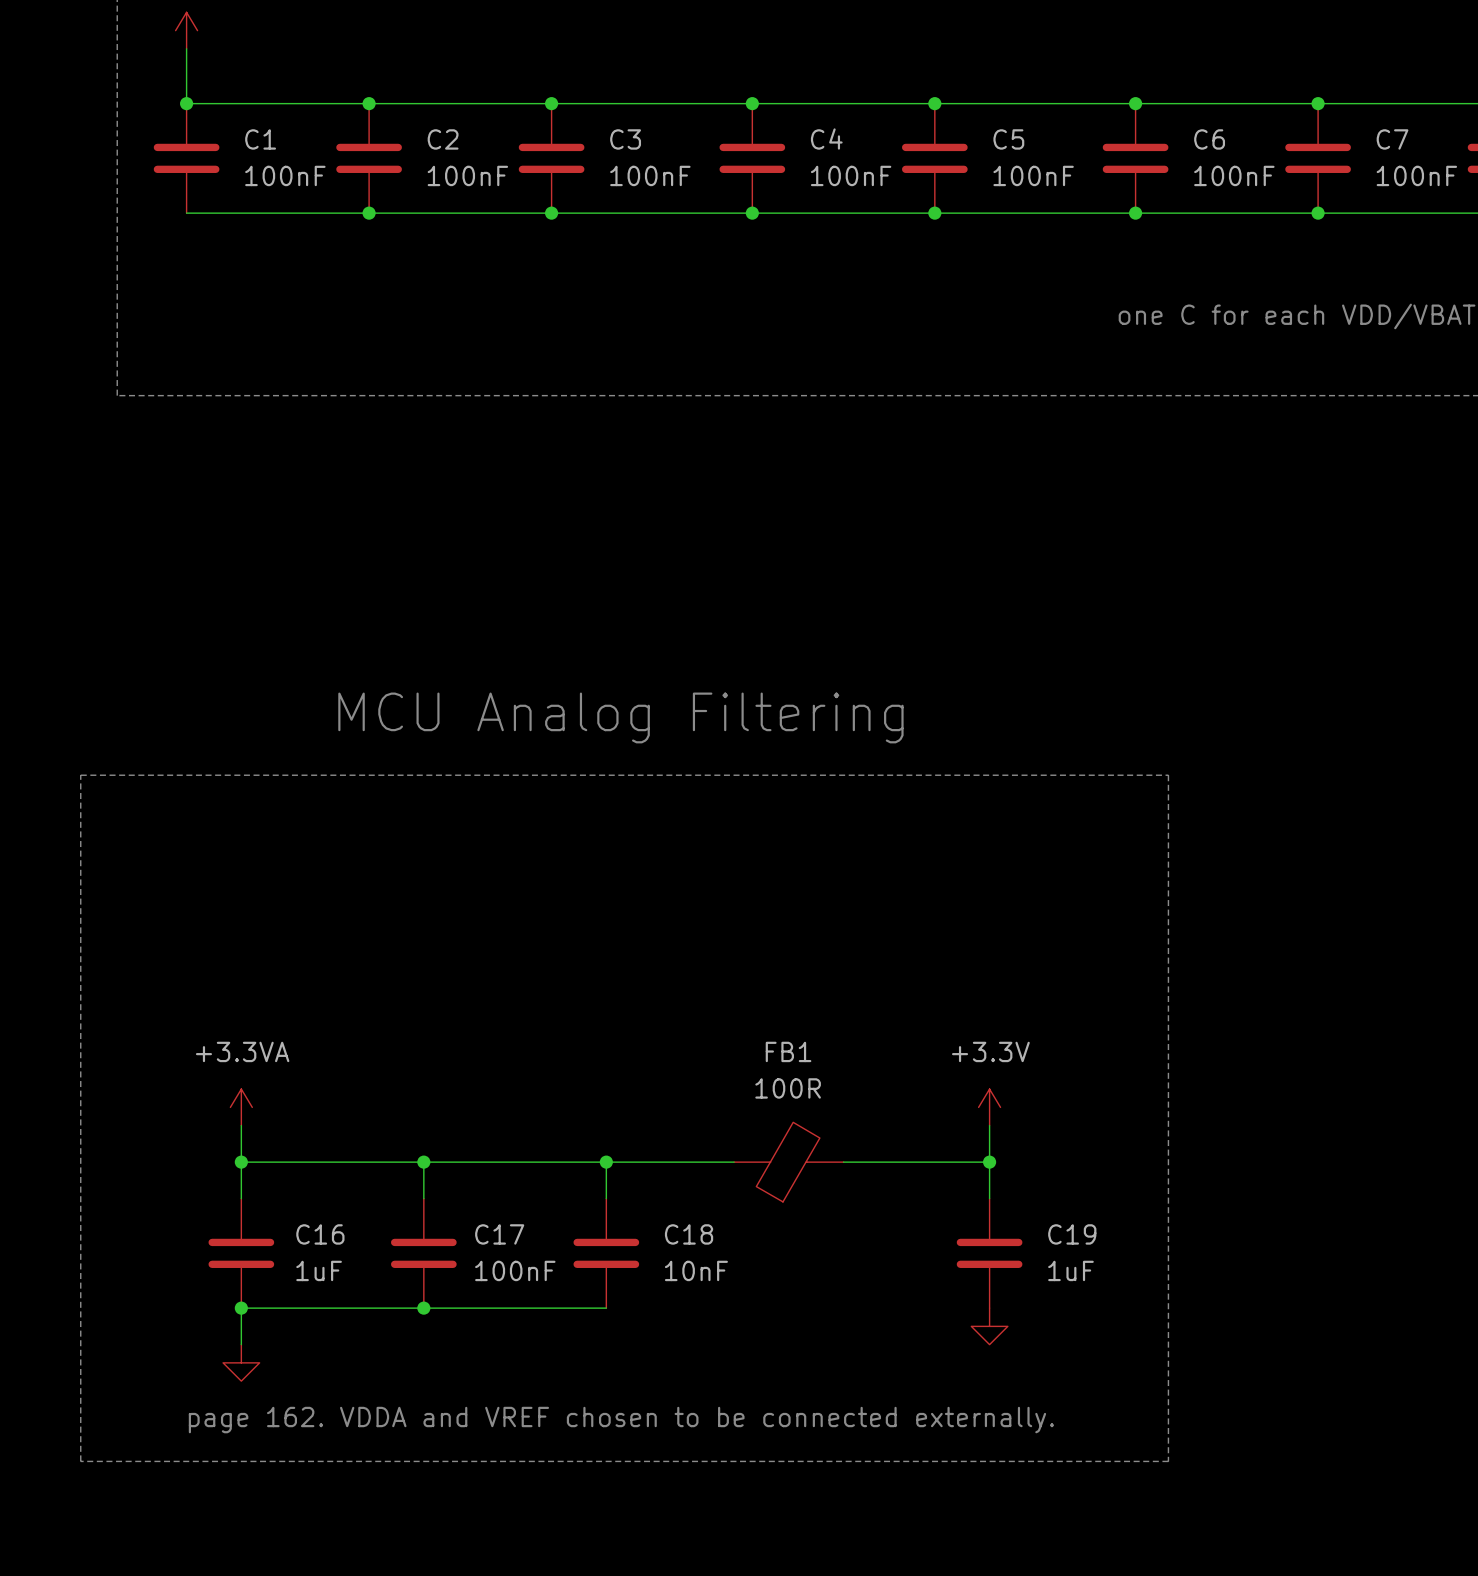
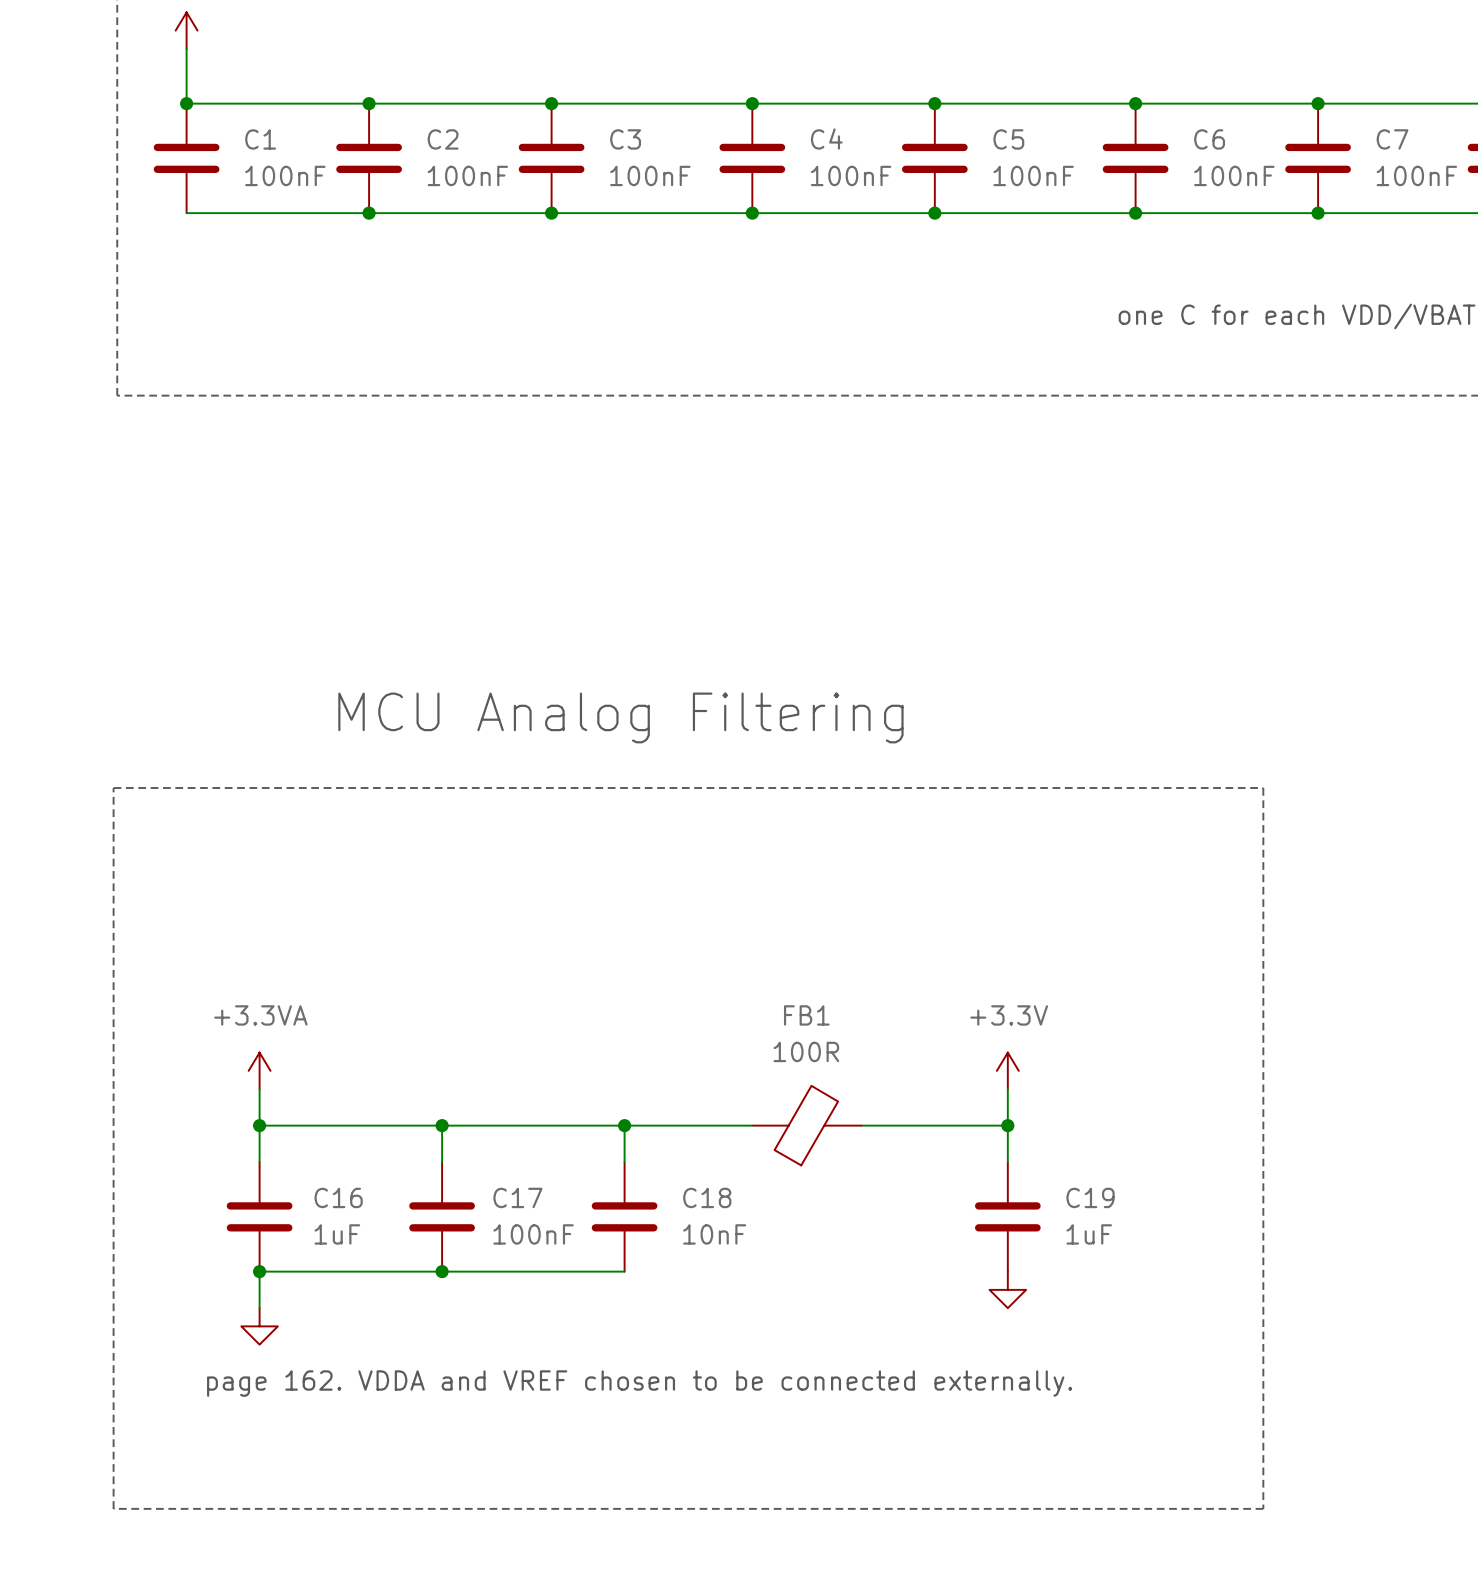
line: (80, 775) (1168, 775) (1168, 1461) (80, 1461) (80, 775) -> (113, 788) (113, 1508) (1263, 1508) (1263, 788) (113, 788)
power symbol position: +3.3VA (241, 1107) -> +3.3VA (259, 1070)
power symbol position: +3.3V (989, 1107) -> +3.3V (1007, 1070)
wire: (241, 1125) (241, 1198) -> (259, 1089) (259, 1162)
wire: (989, 1125) (989, 1198) -> (1007, 1089) (1007, 1162)
wire: (241, 1162) (734, 1162) -> (259, 1125) (752, 1125)
junction position: (241, 1162) -> (259, 1125)
wire: (423, 1162) (423, 1198) -> (442, 1125) (442, 1162)
junction position: (423, 1162) -> (442, 1125)
wire: (606, 1162) (606, 1198) -> (624, 1125) (624, 1162)
junction position: (606, 1162) -> (624, 1125)
FB1 position: (788, 1162) -> (807, 1125)
wire: (843, 1162) (989, 1162) -> (861, 1125) (1007, 1125)
junction position: (989, 1162) -> (1007, 1125)
C16 position: (241, 1253) -> (259, 1216)
C17 position: (423, 1253) -> (442, 1216)
C18 position: (606, 1253) -> (624, 1216)
C19 position: (989, 1253) -> (1007, 1216)
junction position: (241, 1308) -> (259, 1271)
junction position: (423, 1308) -> (442, 1271)
wire: (606, 1308) (241, 1308) (241, 1344) -> (624, 1271) (259, 1271) (259, 1308)
power symbol position: (989, 1326) -> (1007, 1289)
power symbol position: (241, 1362) -> (259, 1326)
text position: page 162. VDDA and VREF chosen to be connected externally. (621, 1420) -> page 162. VDDA and VREF chosen to be connected externally. (639, 1383)

